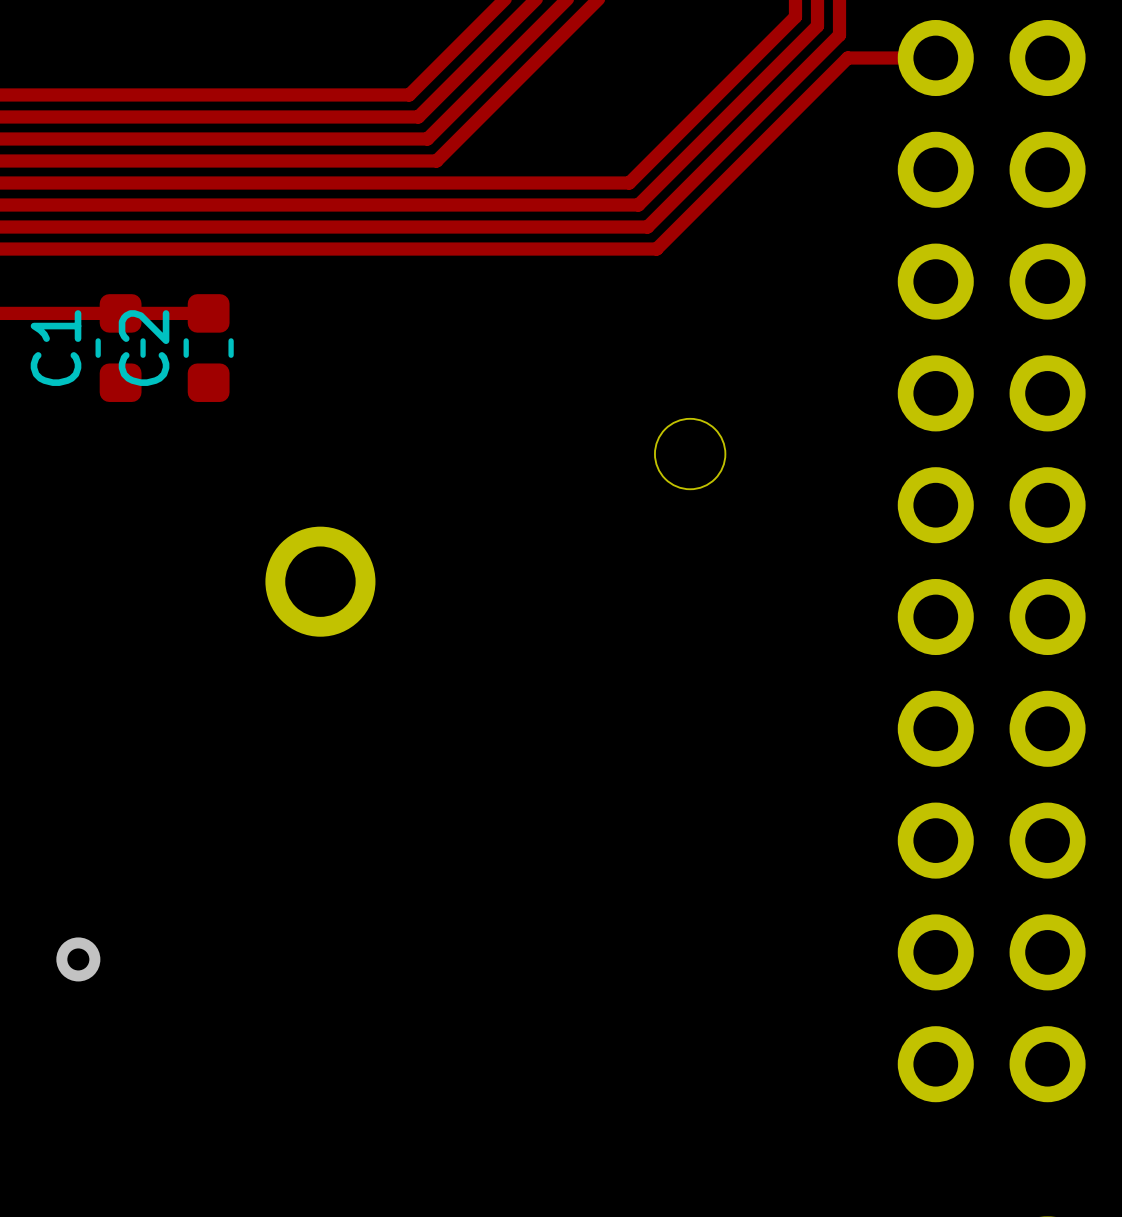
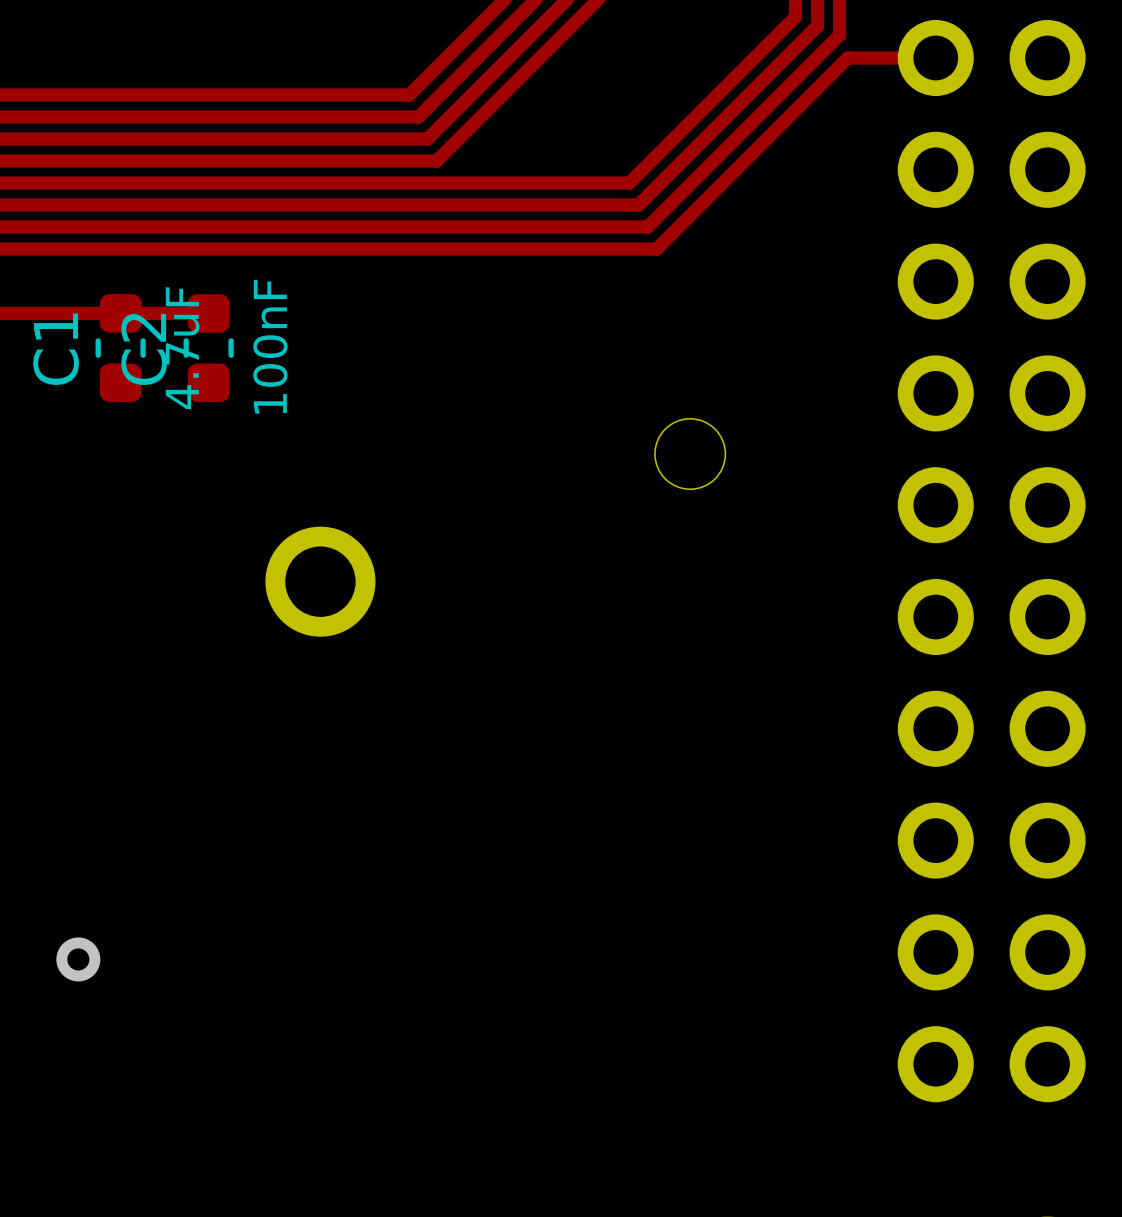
C1 value: none -> 4.7uF (182, 348)
C2 value: none -> 100nF (270, 346)

